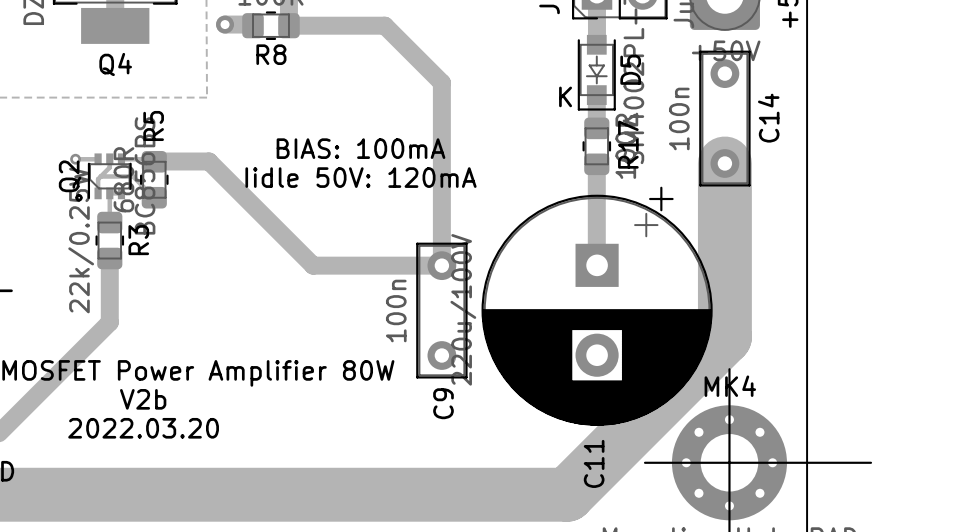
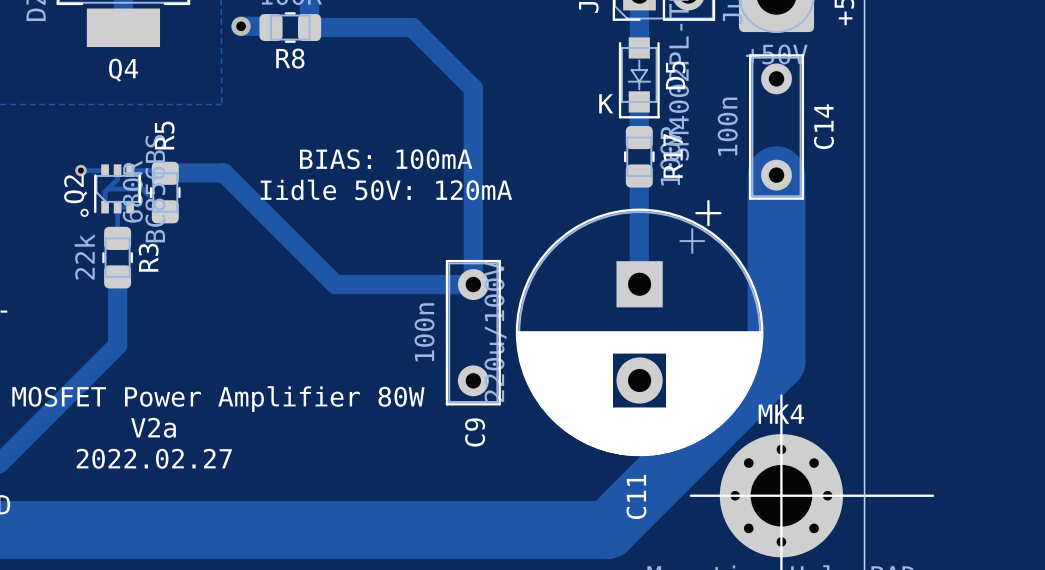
R3 value: 22k/0.25W (81, 240) -> 22k (84, 256)
text: V2b (143, 399) -> V2a (153, 427)
text: 2022.03.20 (143, 428) -> 2022.02.27 (154, 458)

